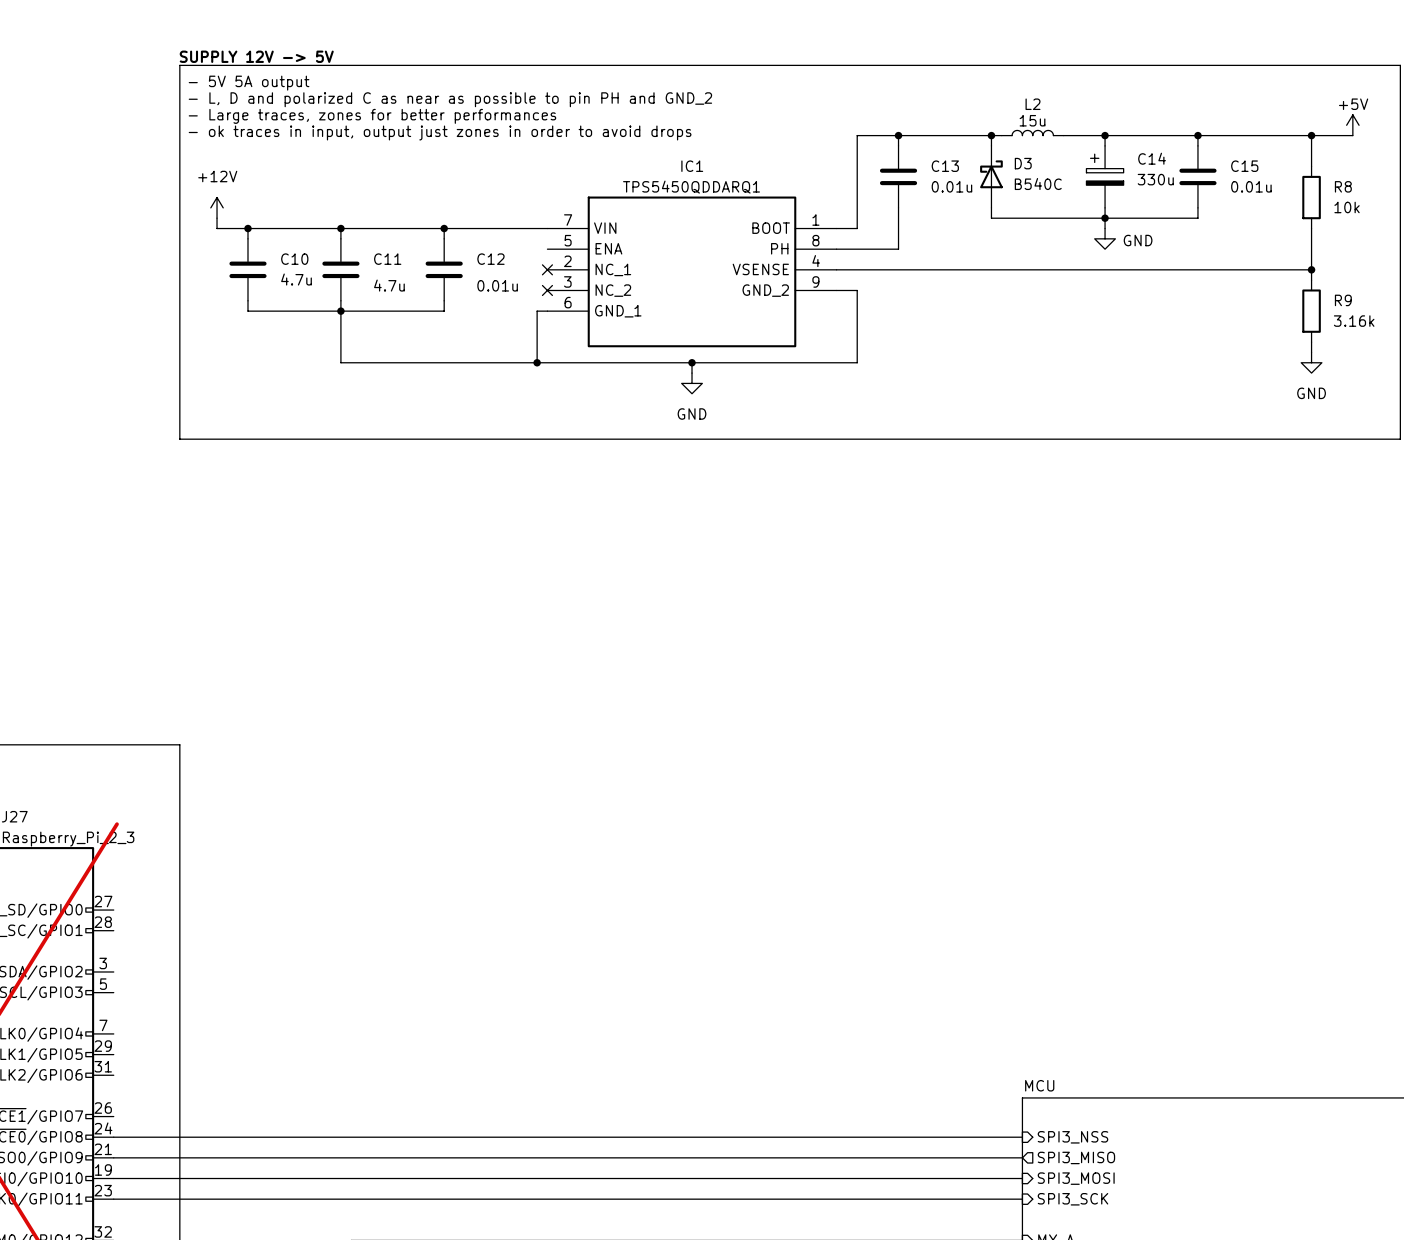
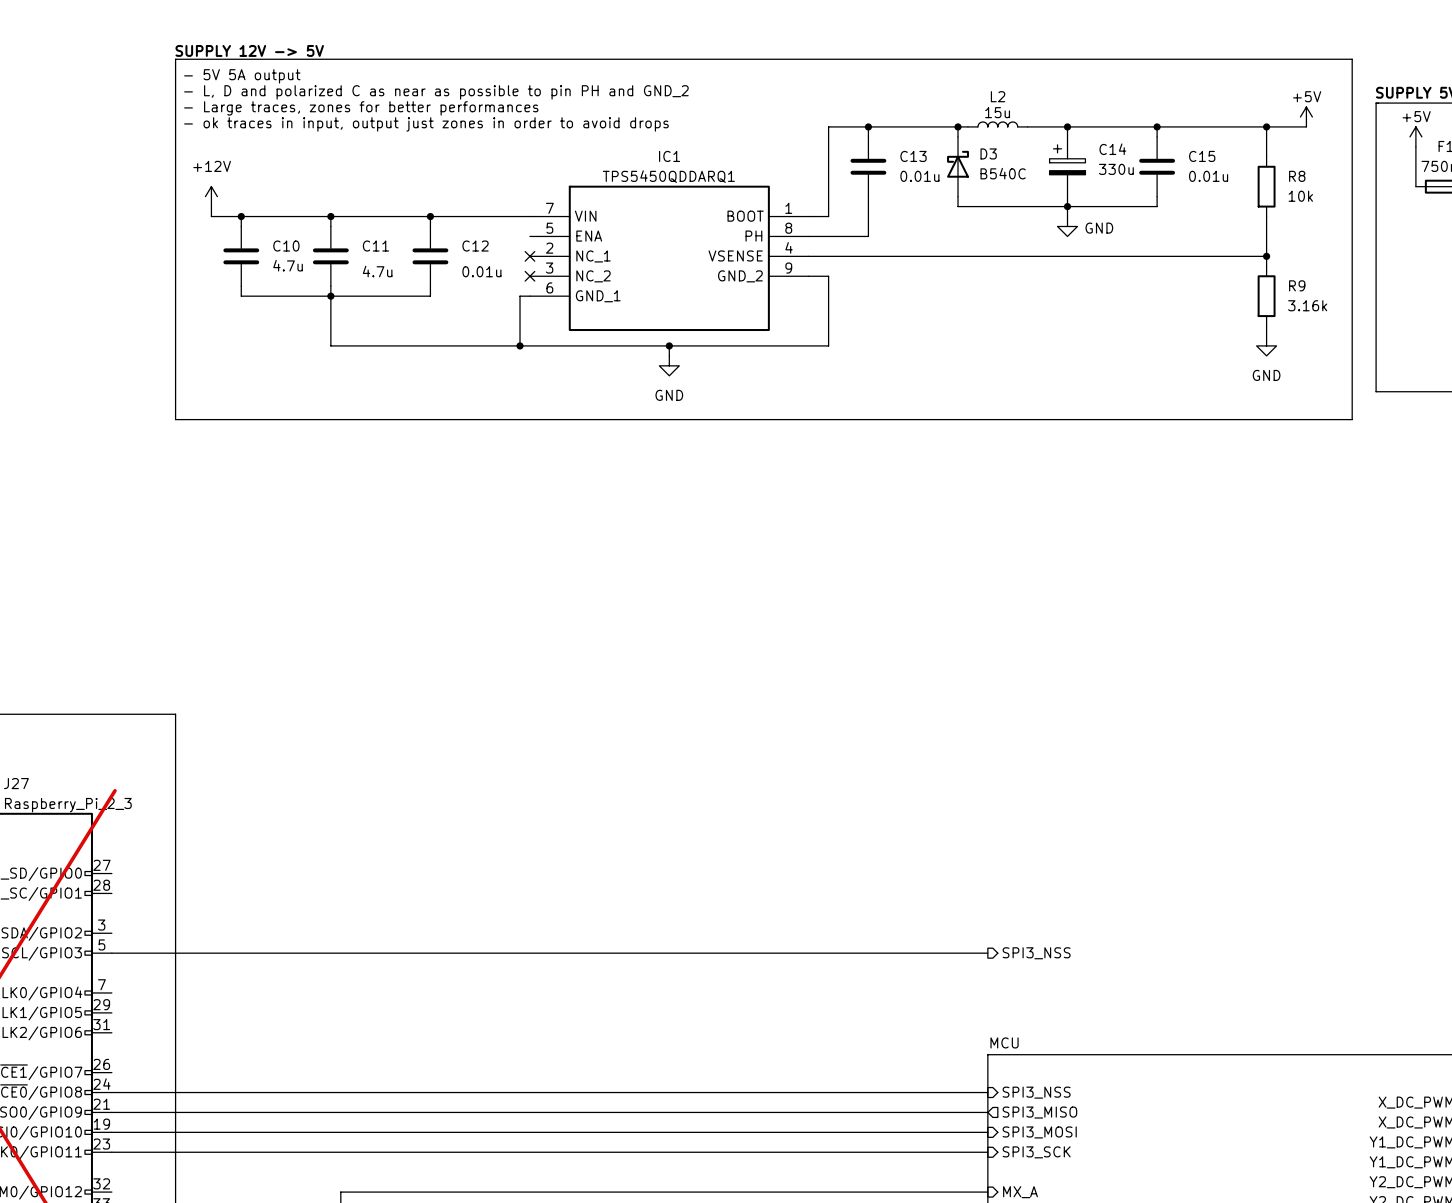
wire: none -> (111, 953) (987, 953)
sheet pin: none -> SPI3_NSS (1036, 953)

